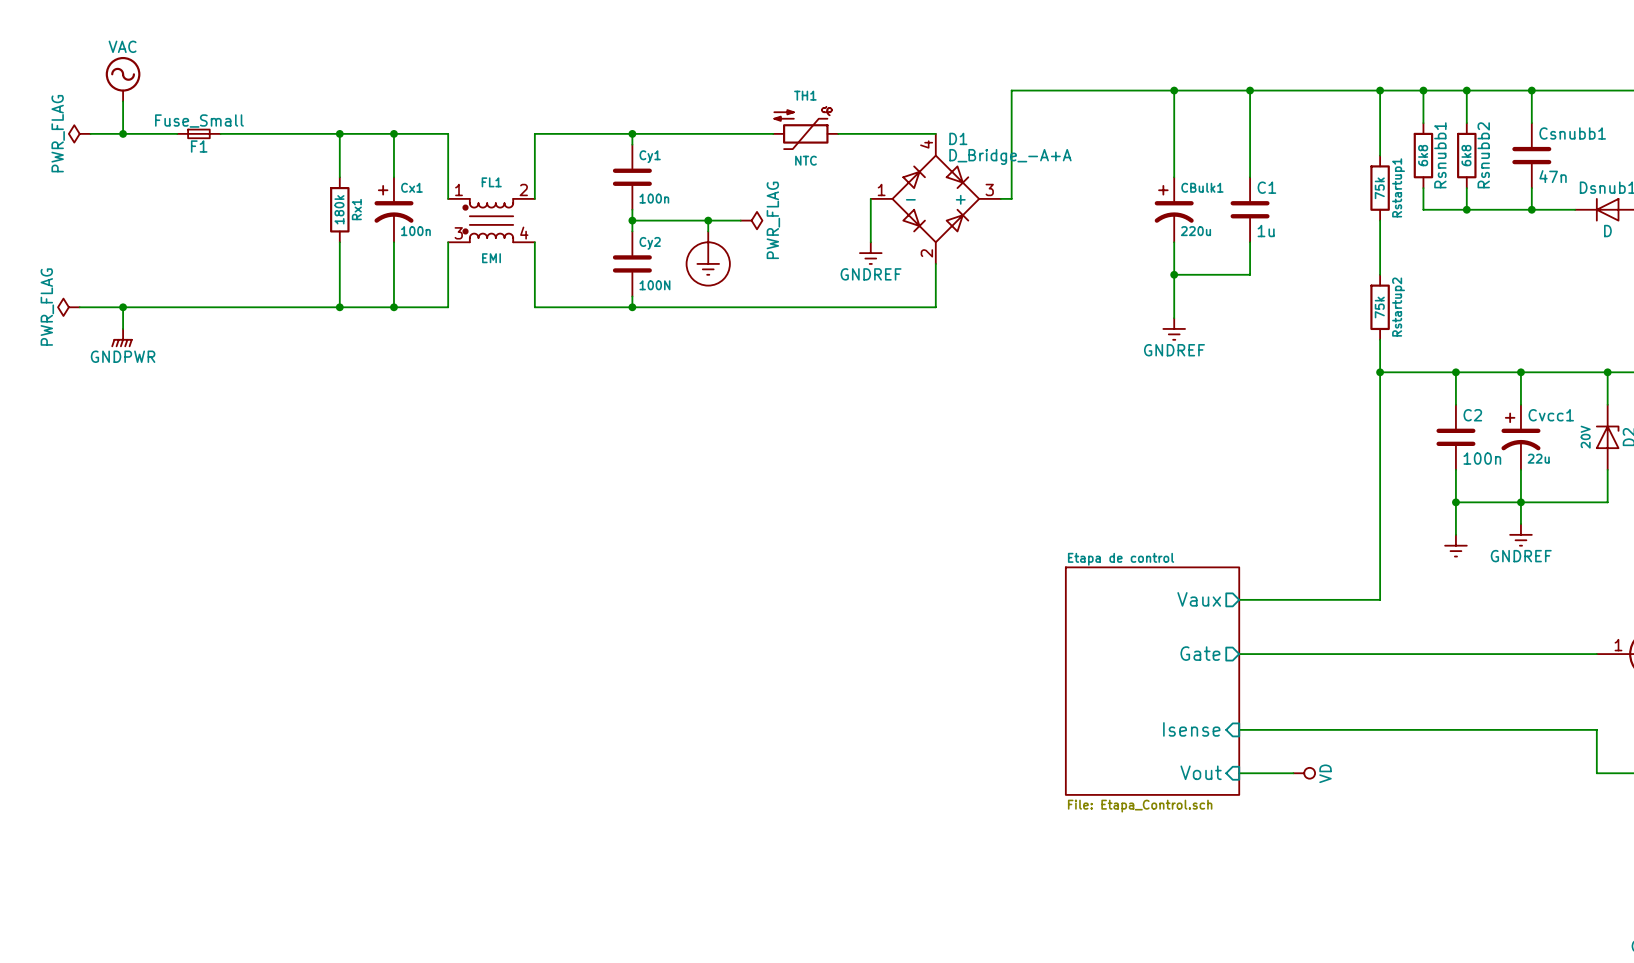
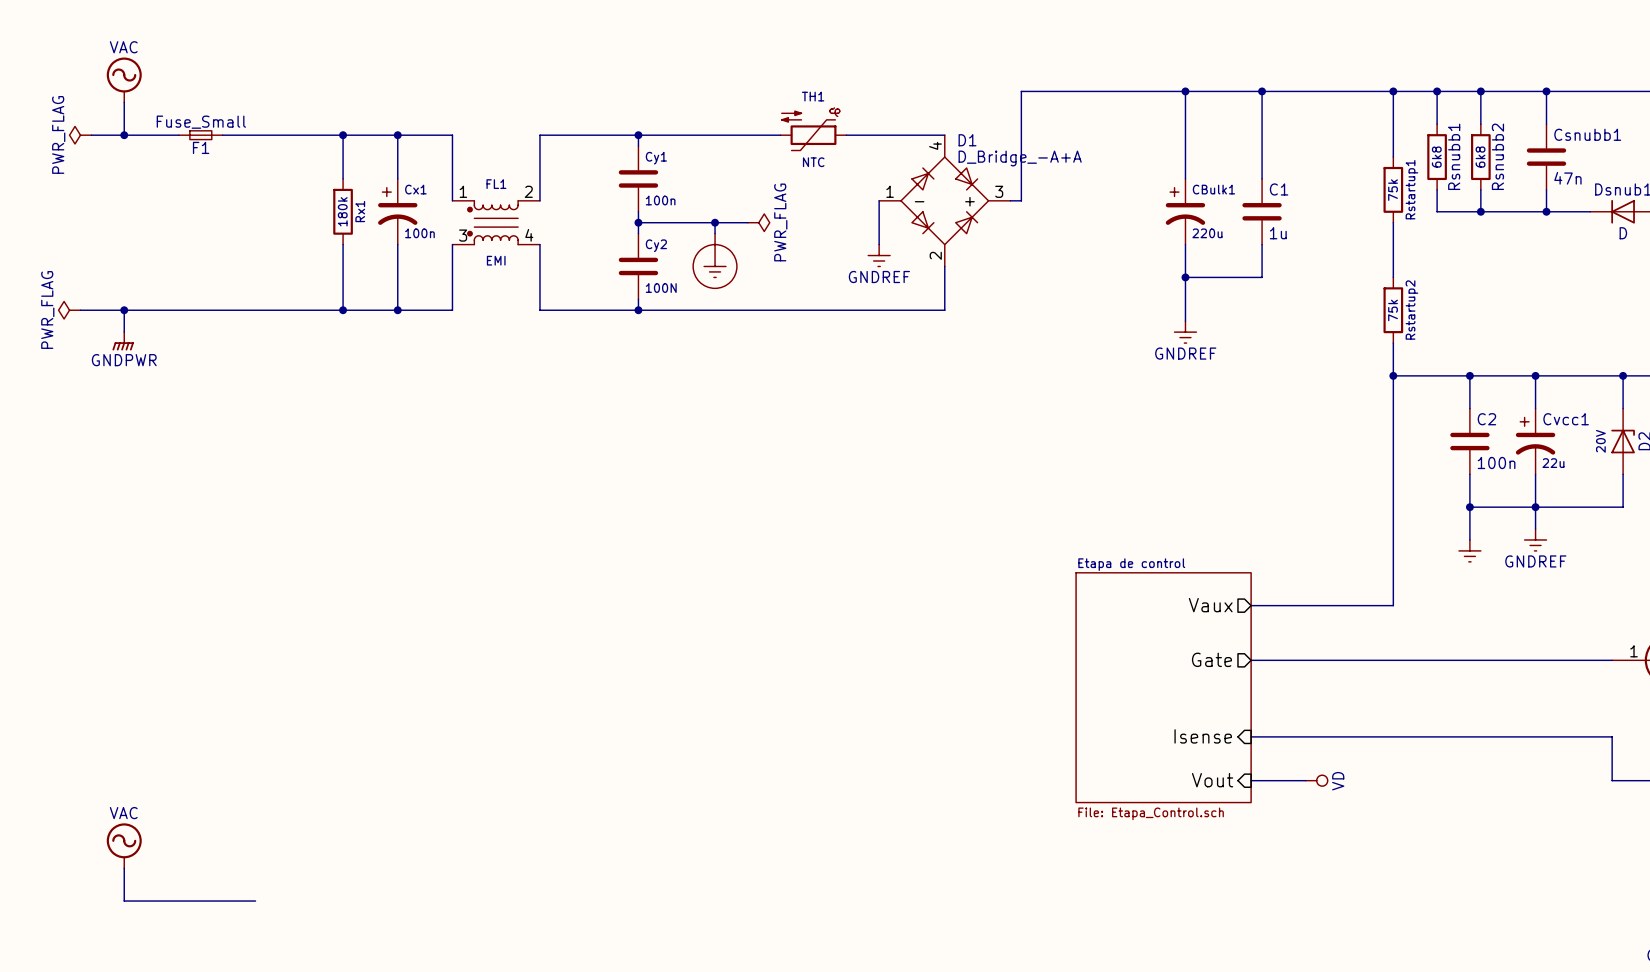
power symbol: none -> VAC (124, 845)
wire: none -> (124, 868) (124, 901) (255, 901)

